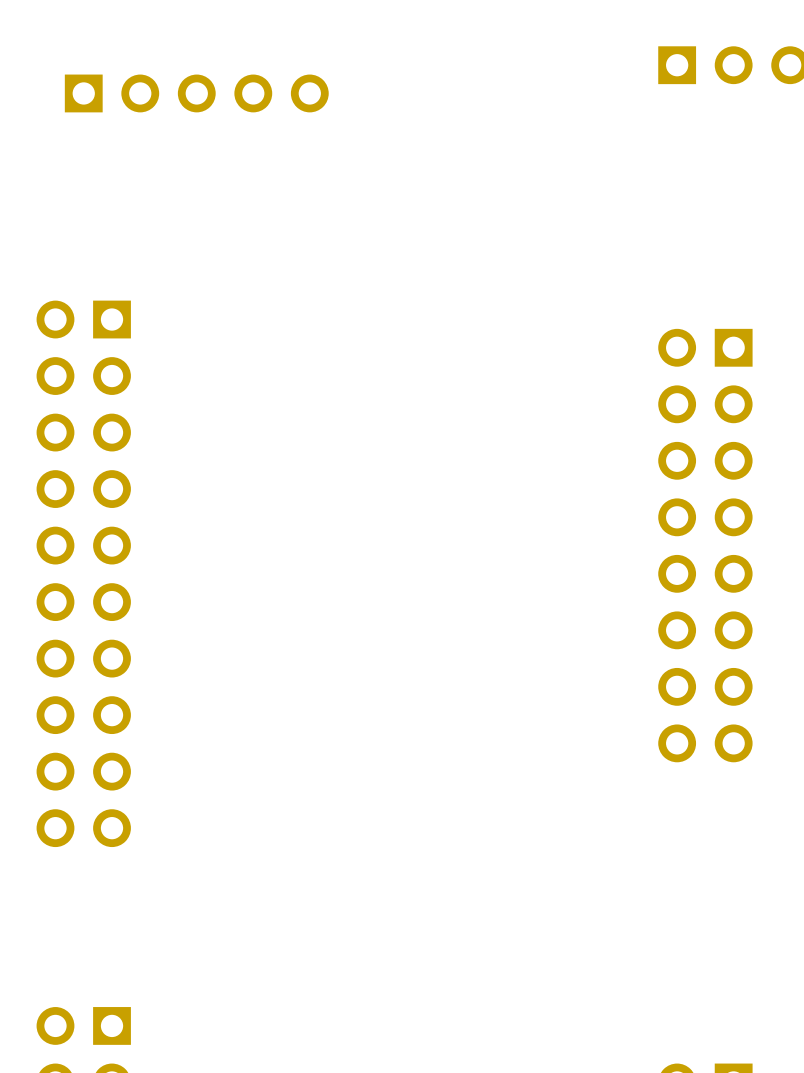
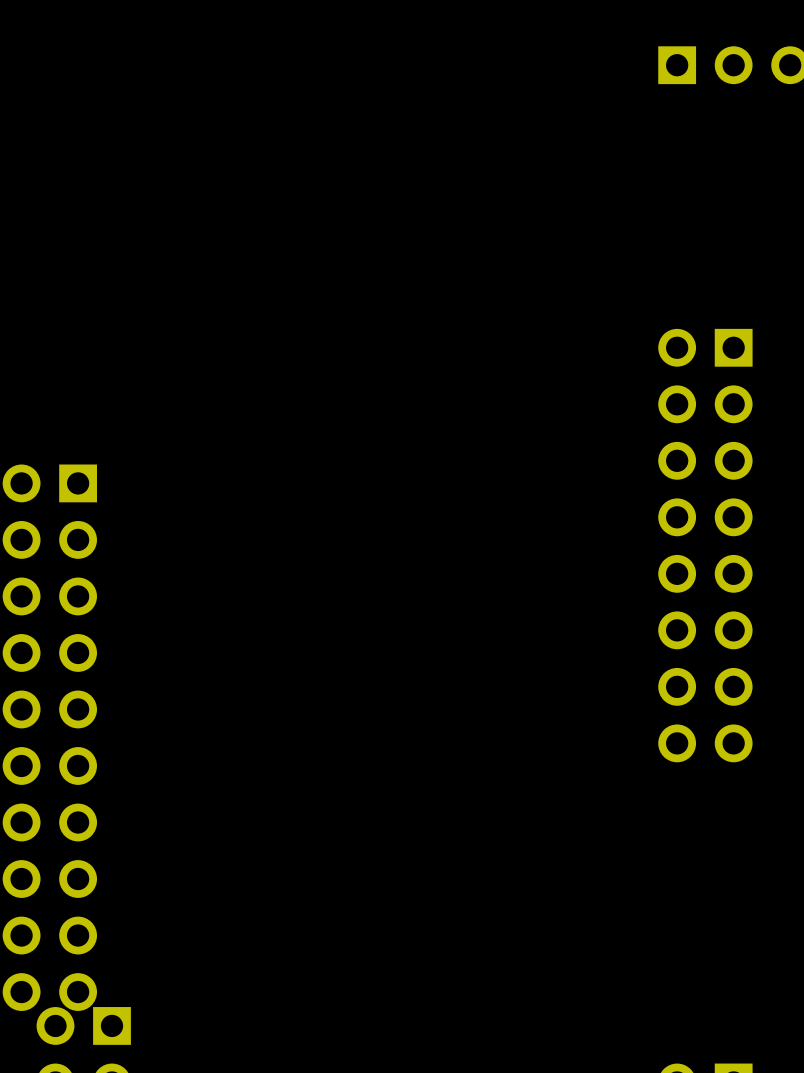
part: (196, 93) -> none
part position: (83, 573) -> (49, 737)

